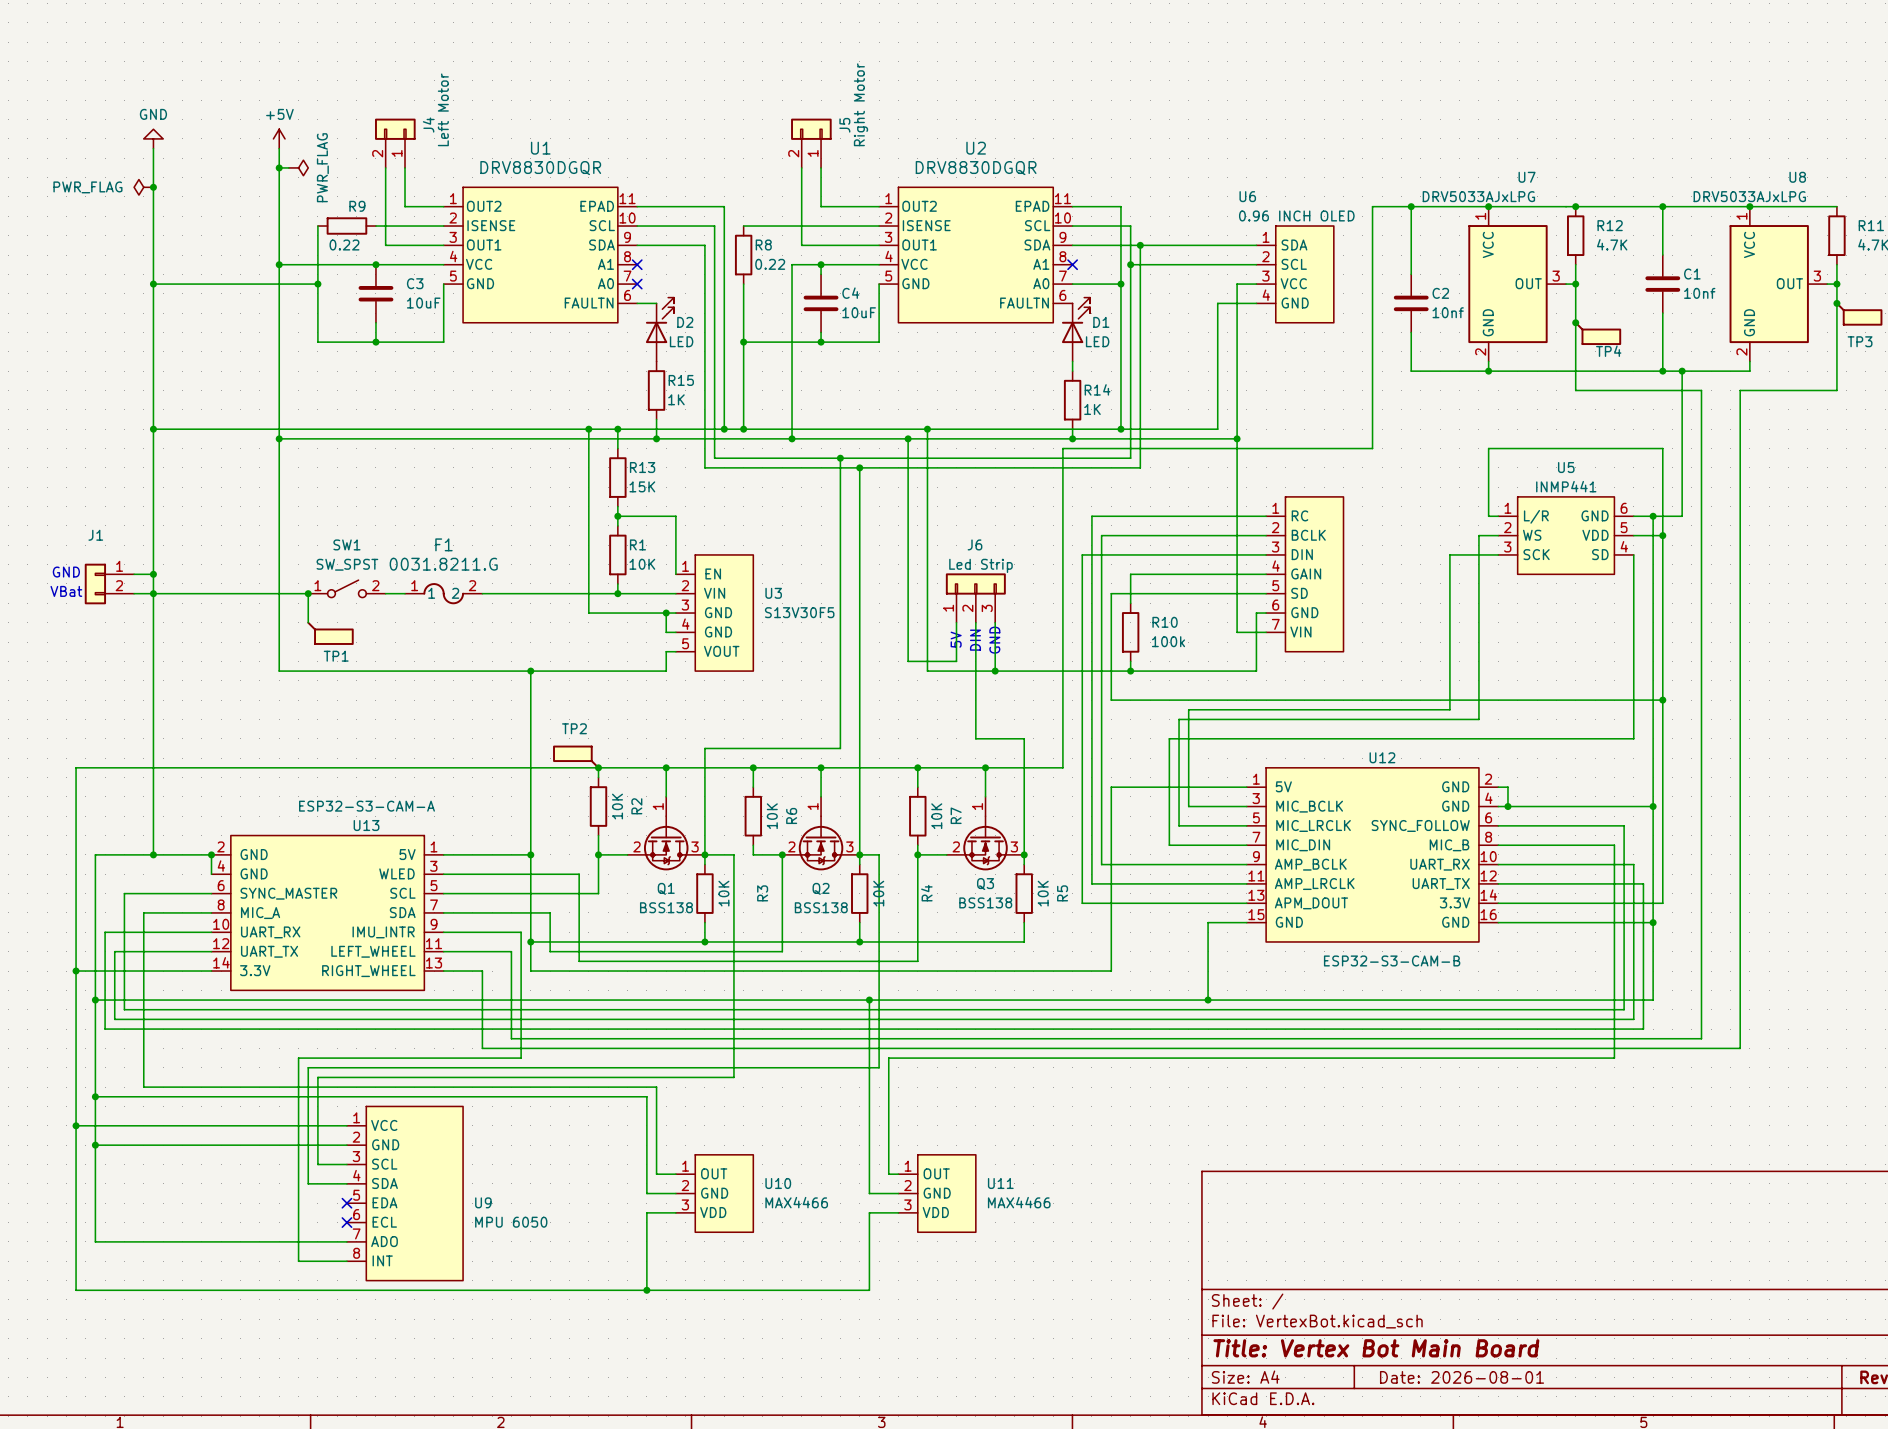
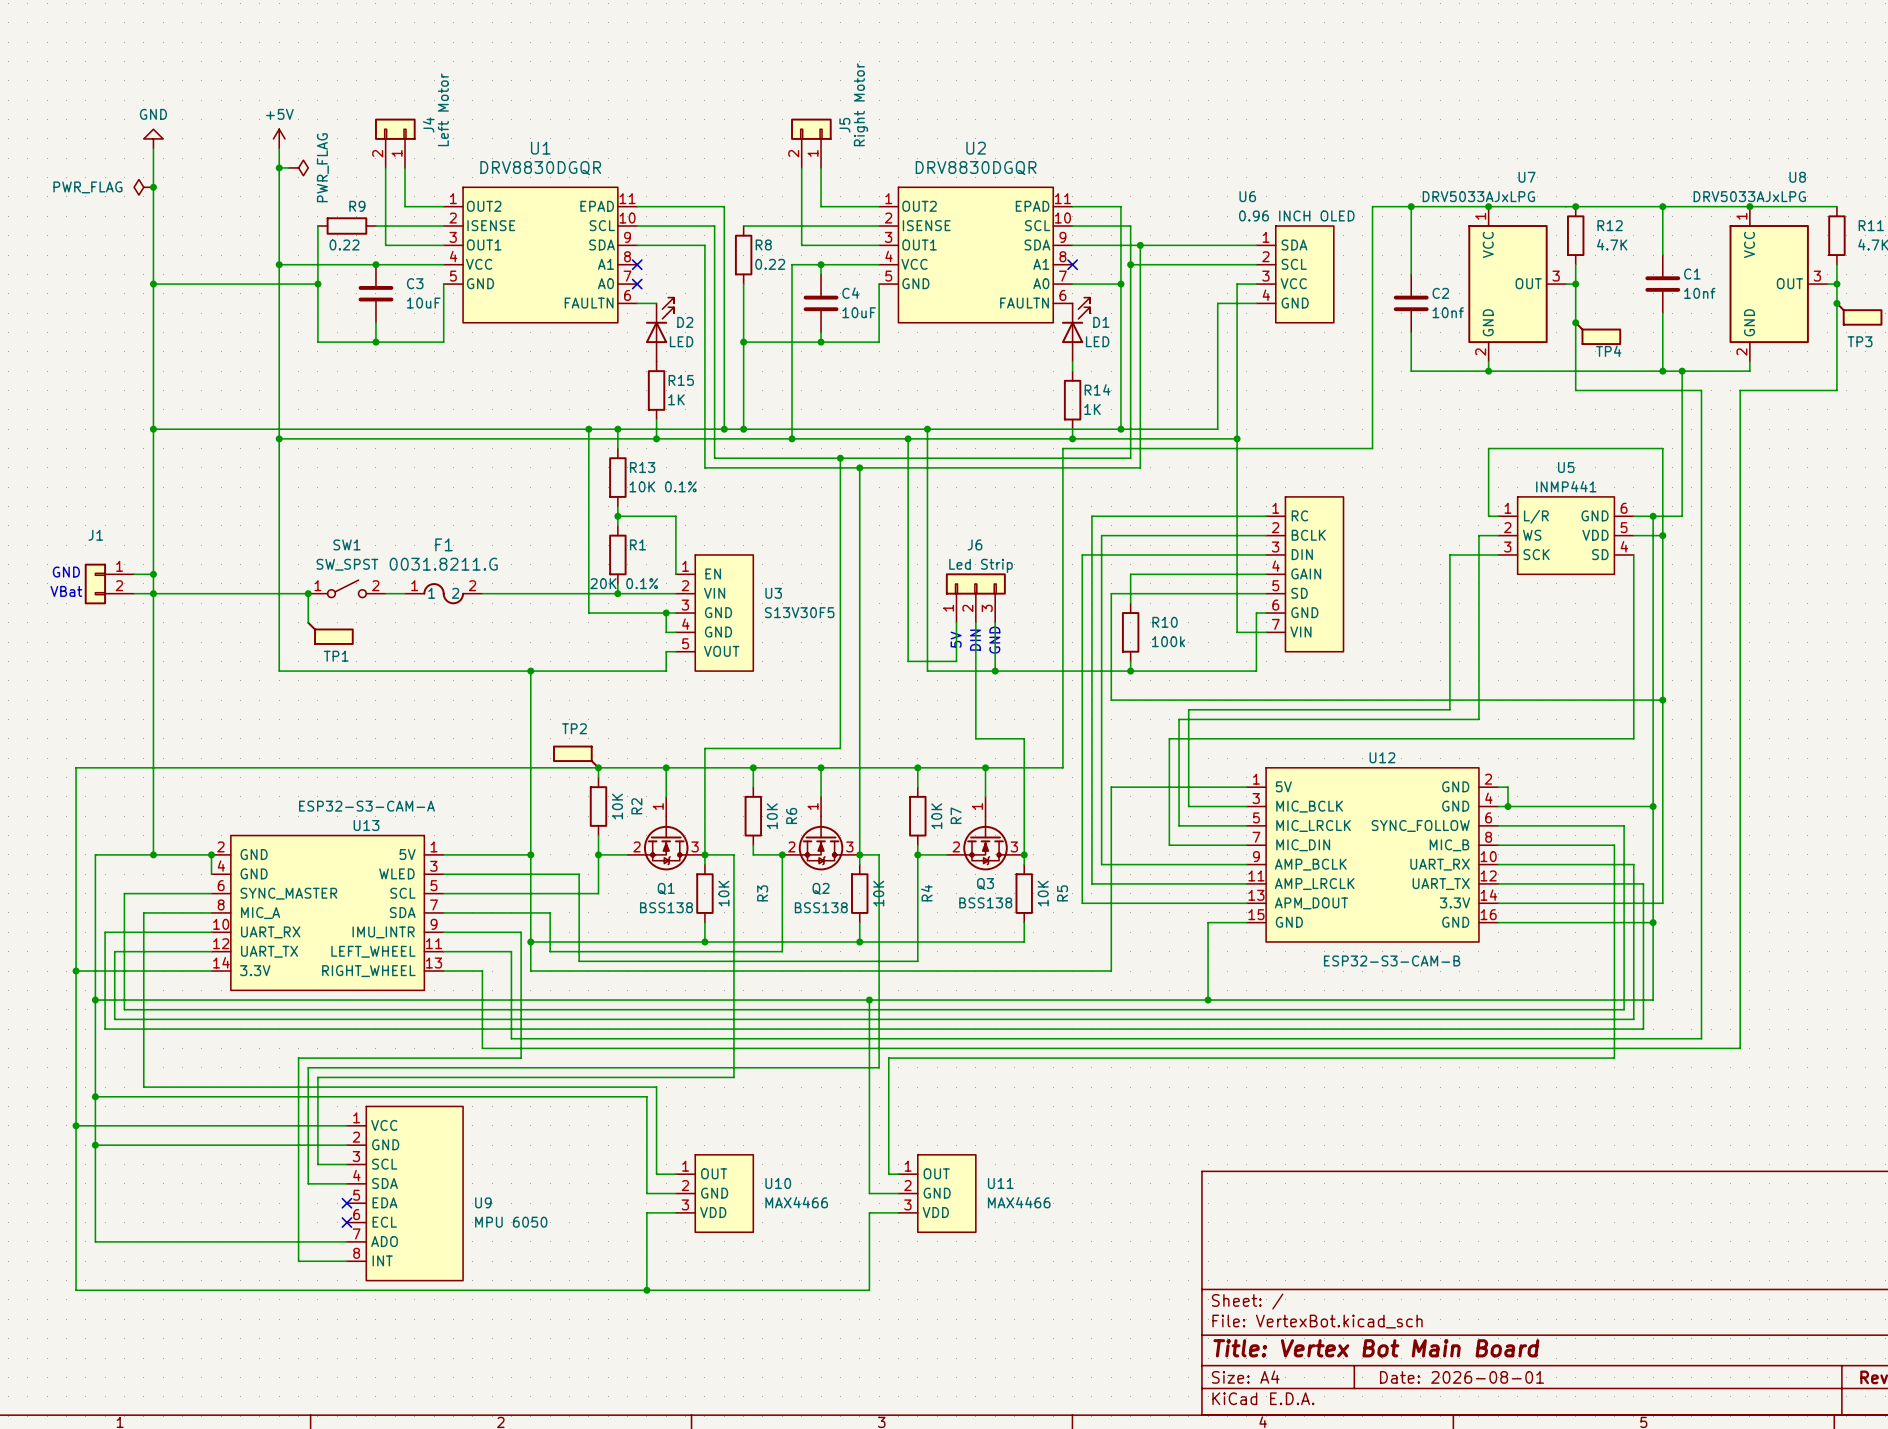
R13 value: 15K (642, 486) -> 10K 0.1% (663, 486)
R1 value: 10K (642, 564) -> 20K 0.1% (624, 583)

